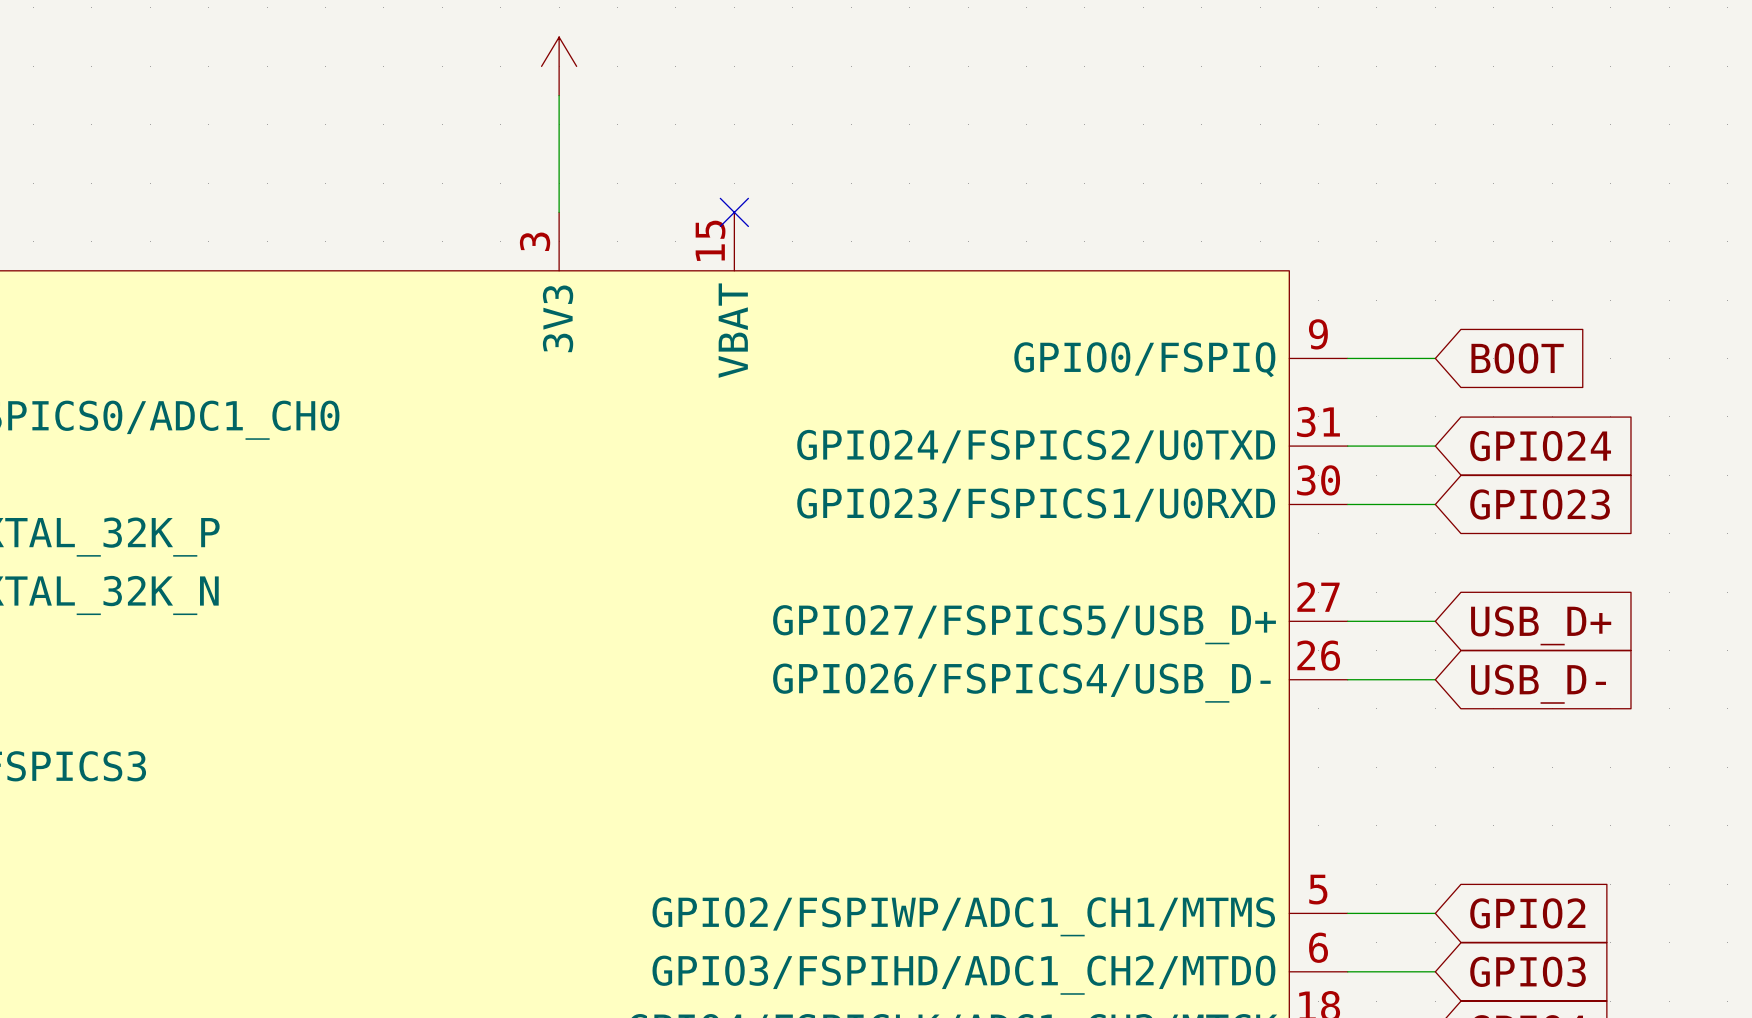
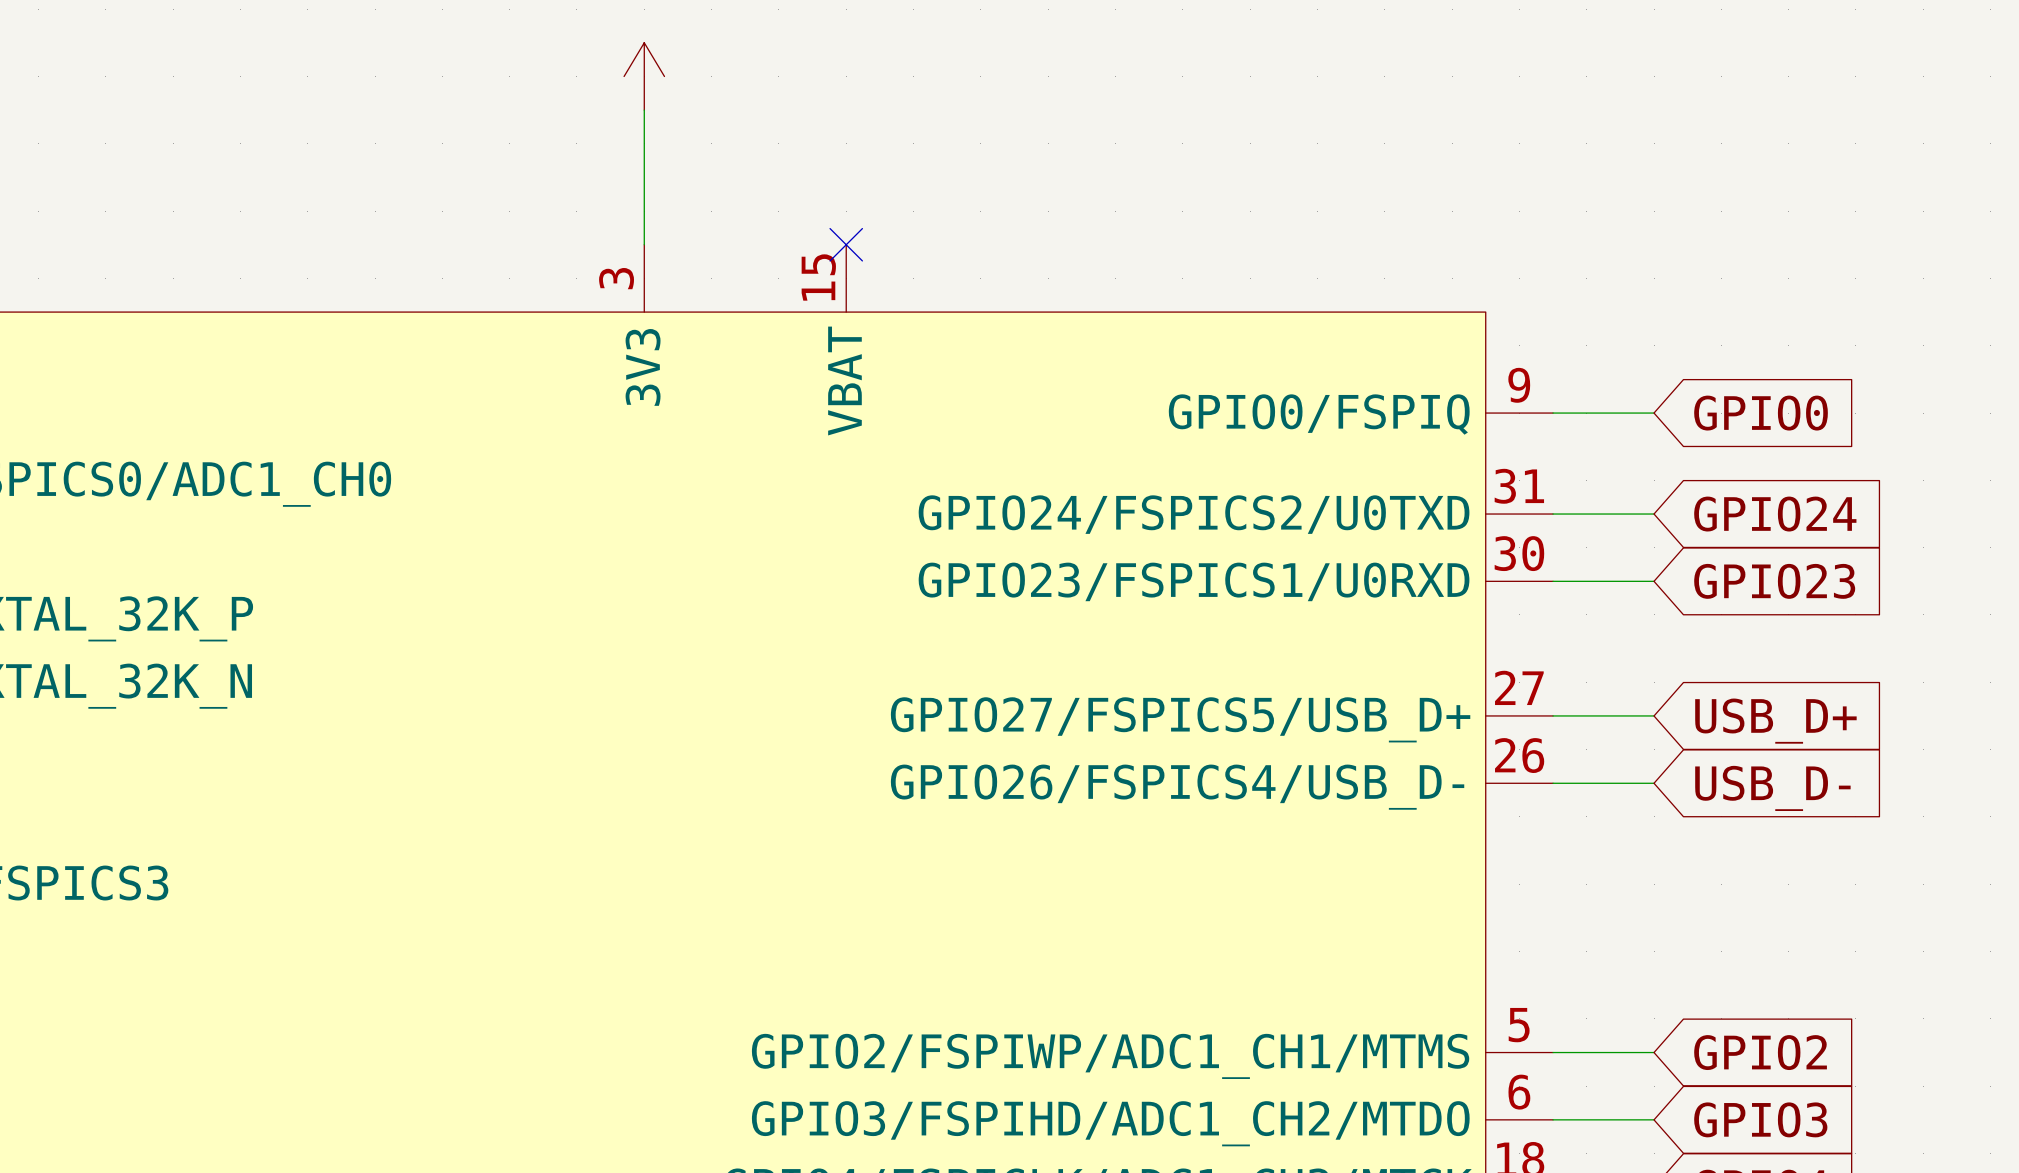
global label: BOOT (1517, 358) -> GPIO0 (1761, 413)

